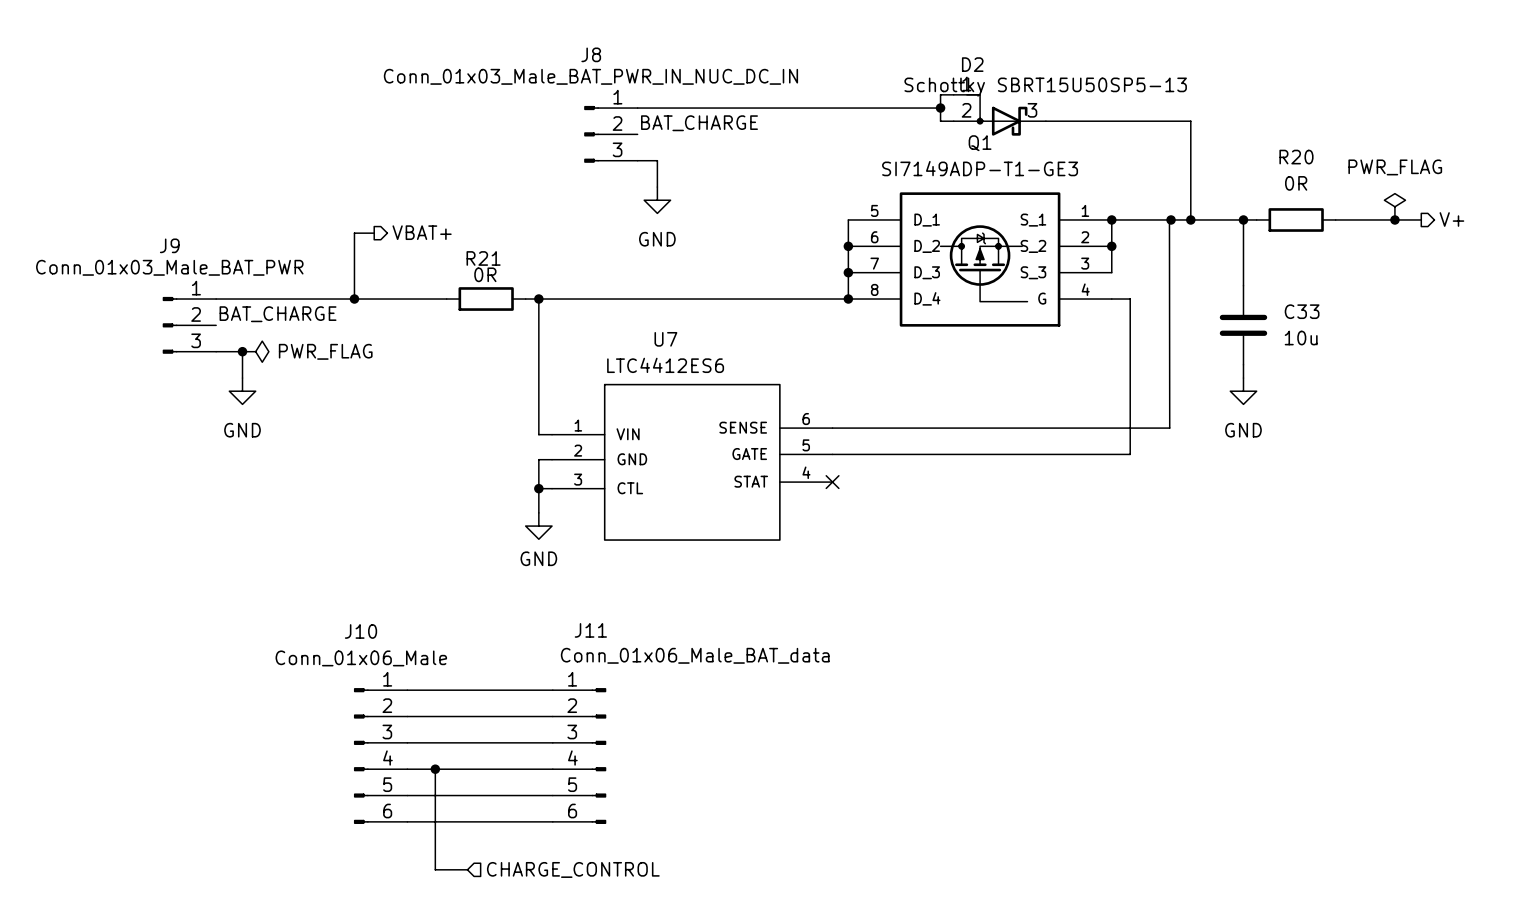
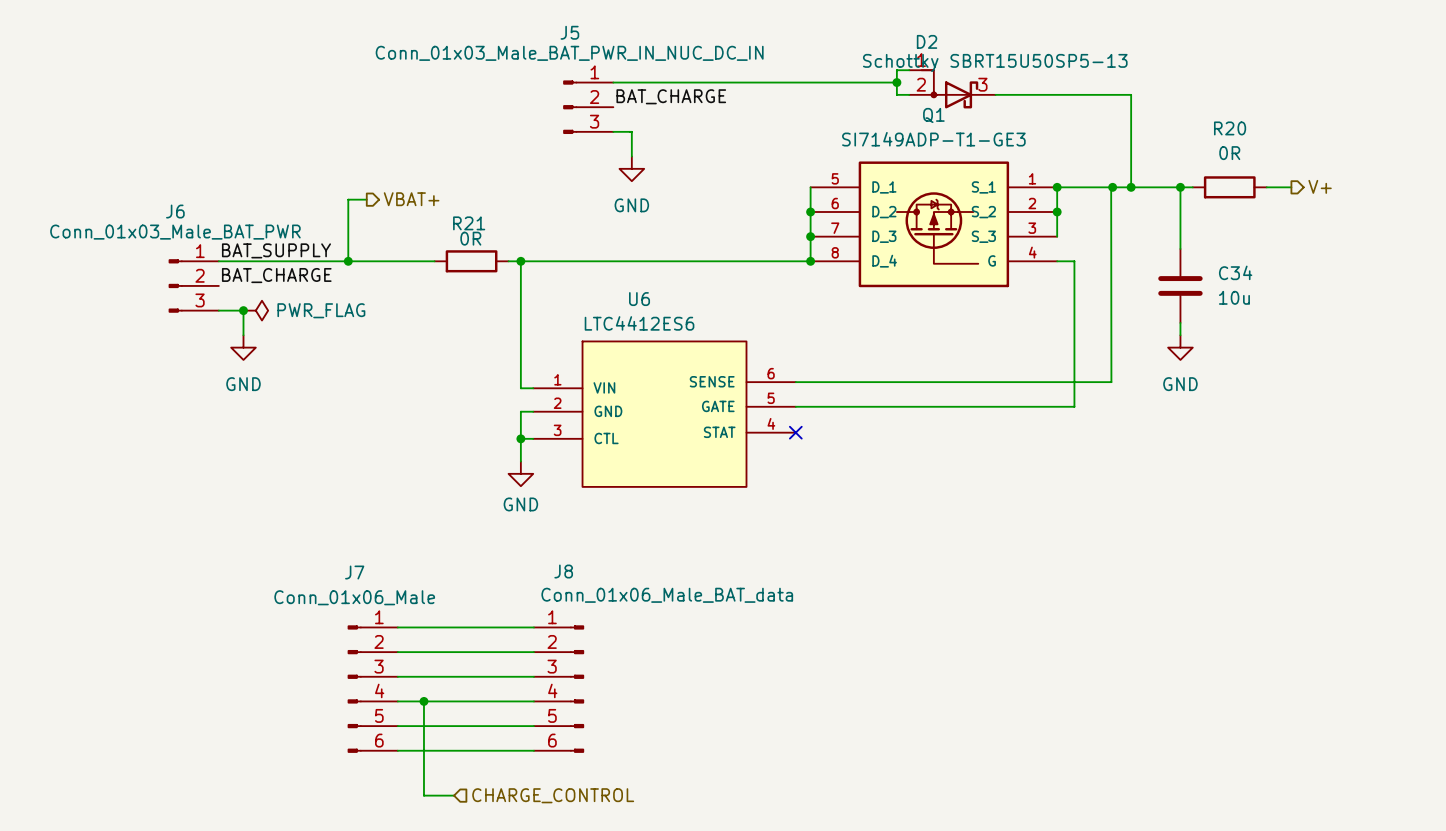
J8 name: J8 (591, 54) -> J5 (569, 32)
power symbol: PWR_FLAG (1394, 206) -> none
wire: (1362, 219) (1421, 219) -> none
junction: (1394, 219) -> none
hierarchical label position: V+ (1451, 219) -> V+ (1320, 186)
J9 name: J9 (169, 245) -> J6 (175, 211)
label: none -> BAT_SUPPLY (276, 250)
C33 name: C33 (1302, 311) -> C34 (1235, 272)
U7 name: U7 (665, 339) -> U6 (639, 299)
J11 name: J11 (590, 630) -> J8 (563, 571)
J10 name: J10 (360, 631) -> J7 (354, 572)

